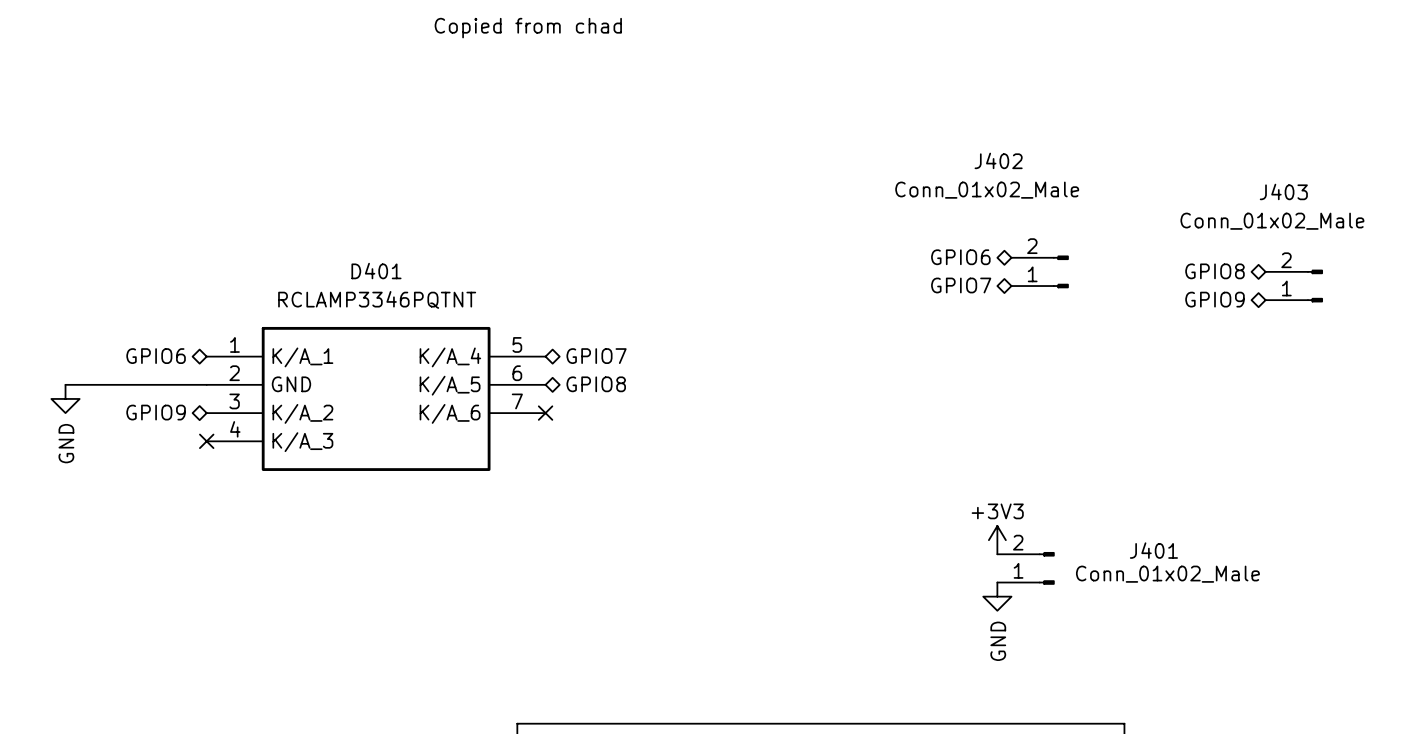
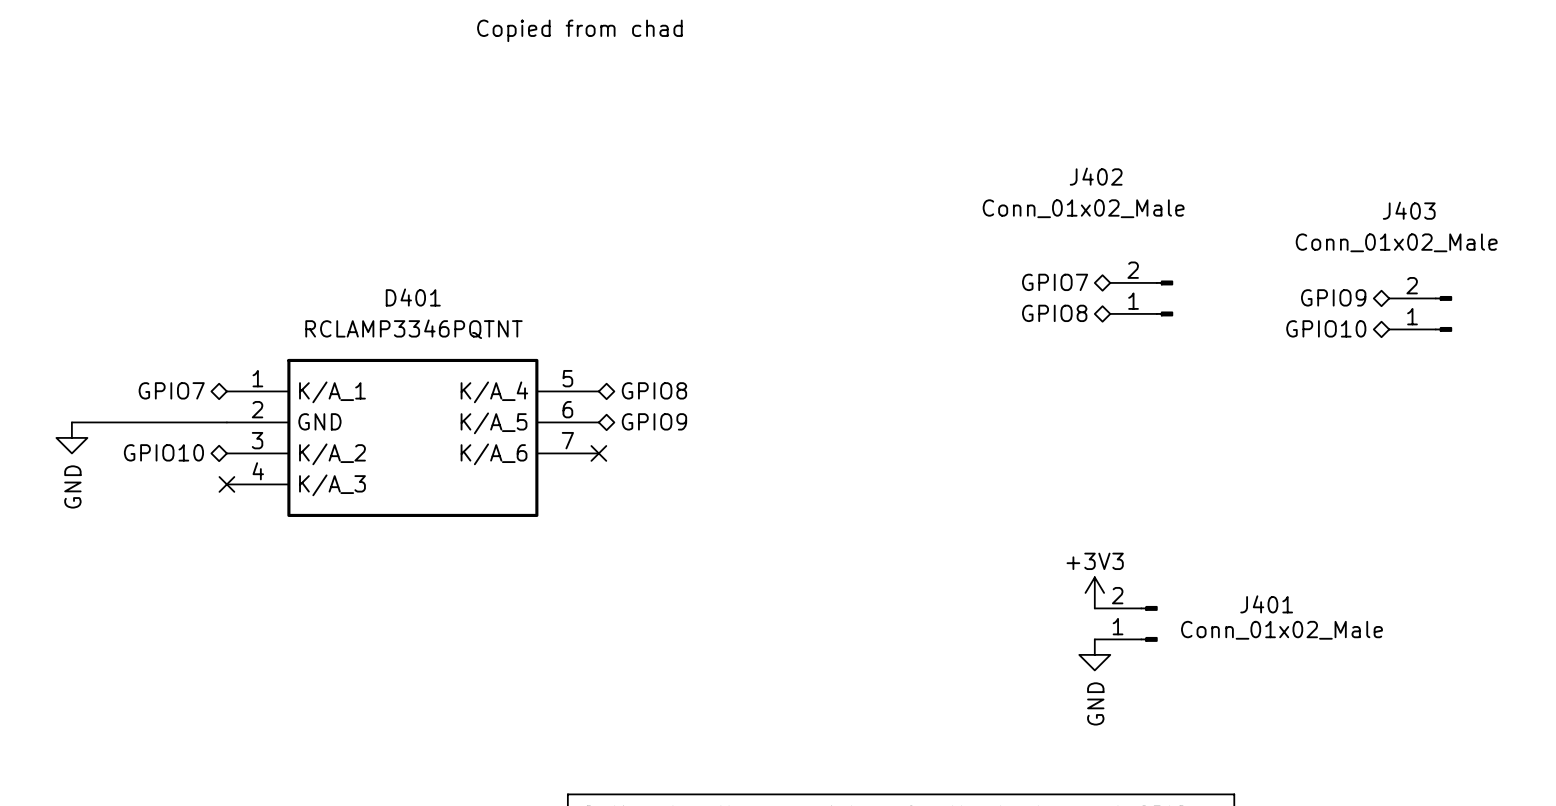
hierarchical label: GPIO6 (960, 257) -> GPIO7 (1055, 282)
hierarchical label: GPIO8 (1215, 271) -> GPIO9 (1333, 297)
hierarchical label: GPIO7 (961, 285) -> GPIO8 (1054, 313)
hierarchical label: GPIO9 (1215, 299) -> GPIO10 (1326, 328)
hierarchical label: GPIO6 (156, 356) -> GPIO7 (171, 390)
hierarchical label: GPIO7 (596, 356) -> GPIO8 (654, 390)
hierarchical label: GPIO8 (596, 384) -> GPIO9 (654, 421)
hierarchical label: GPIO9 (156, 412) -> GPIO10 (163, 452)

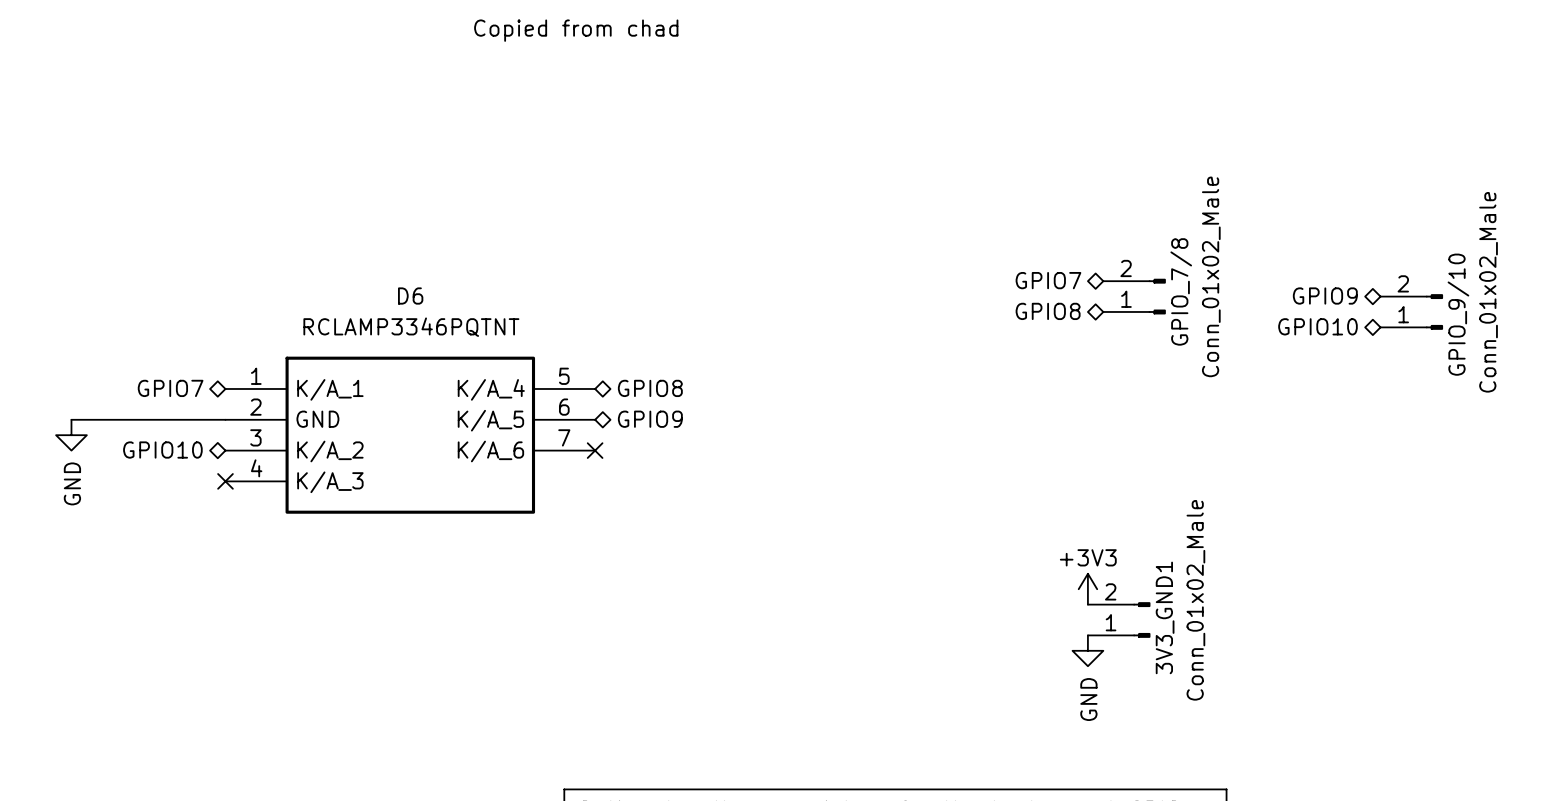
J402 name: J402 (1096, 176) -> GPIO_7/8 (1181, 291)
J402 value rotation: 0° (1083, 208) -> 90° counterclockwise (1211, 276)
J403 name: J403 (1409, 210) -> GPIO_9/10 (1458, 314)
J403 value rotation: 0° (1396, 242) -> 90° counterclockwise (1488, 292)
D401 name: D401 (413, 297) -> D6 (410, 296)
J401 name: J401 (1266, 604) -> 3V3_GND1 (1165, 617)
J401 value rotation: 0° (1281, 630) -> 90° counterclockwise (1195, 600)

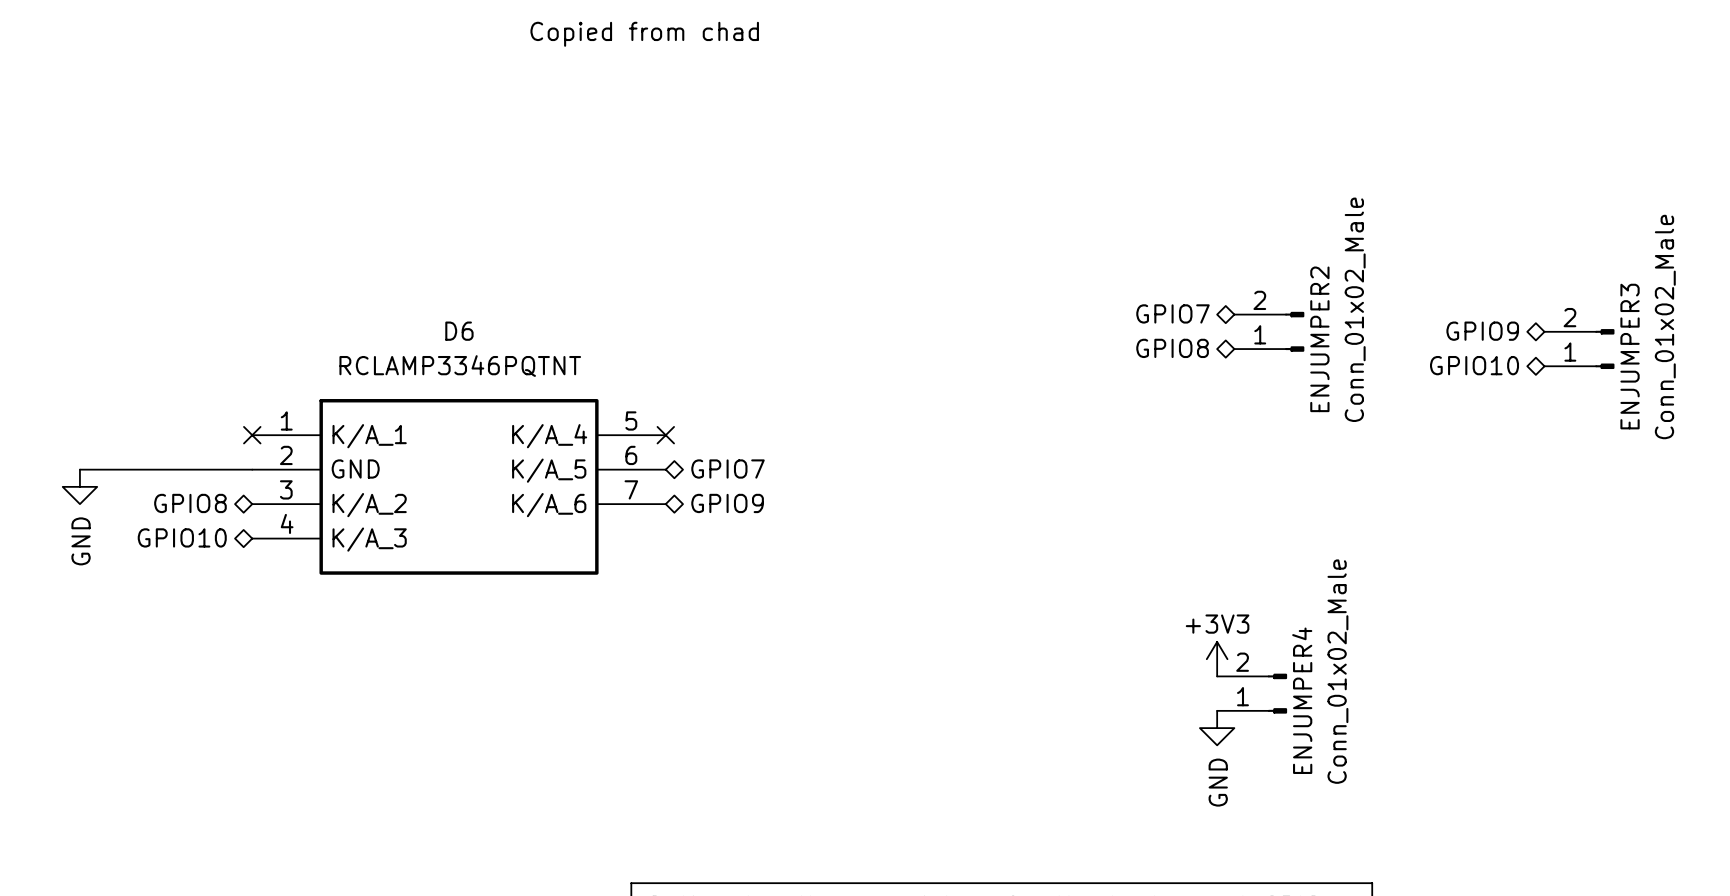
GPIO_7/8 name: GPIO_7/8 (1181, 291) -> ENJUMPER2 (1319, 339)
GPIO_9/10 name: GPIO_9/10 (1458, 314) -> ENJUMPER3 (1630, 356)
hierarchical label: GPIO7 (170, 388) -> none
no-connect mark: none -> (252, 435)
hierarchical label: GPIO8 (650, 388) -> none
hierarchical label: GPIO9 (650, 419) -> GPIO7 (728, 469)
hierarchical label: GPIO10 (162, 450) -> GPIO8 (190, 503)
no-connect mark position: (595, 450) -> (665, 435)
hierarchical label: none -> GPIO9 (727, 503)
hierarchical label: none -> GPIO10 (182, 537)
no-connect mark: (225, 481) -> none
3V3_GND1 name: 3V3_GND1 (1165, 617) -> ENJUMPER4 (1302, 700)

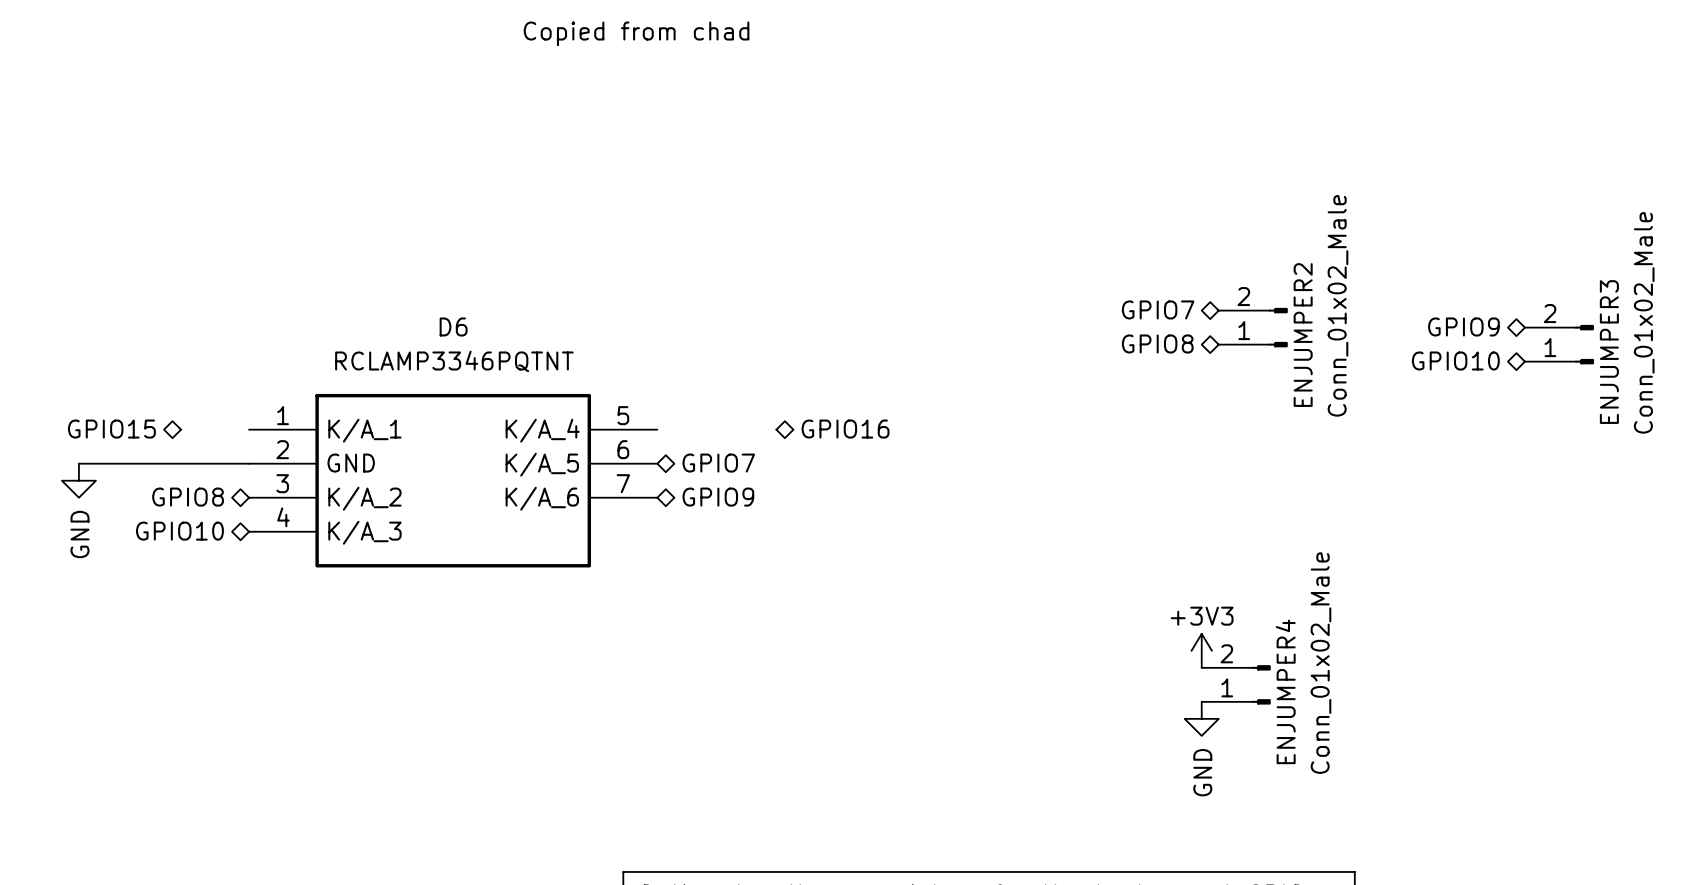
hierarchical label: none -> GPIO15 (111, 429)
hierarchical label: none -> GPIO16 (845, 429)
no-connect mark: (252, 435) -> none
no-connect mark: (665, 435) -> none

